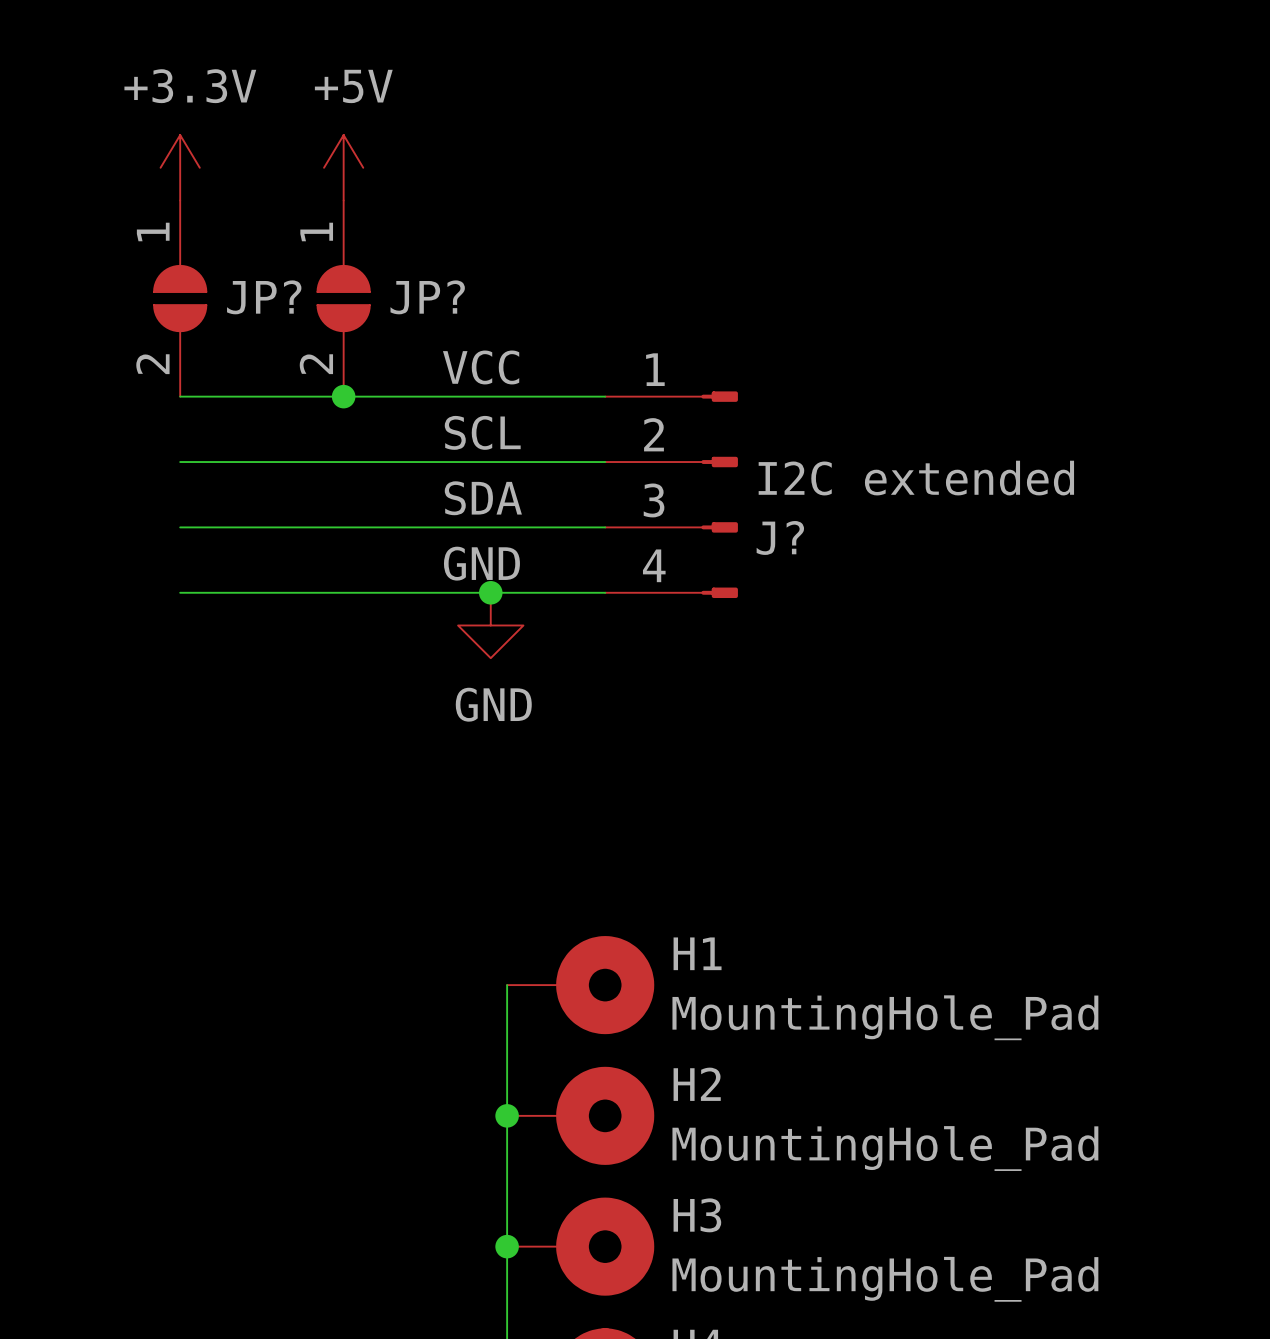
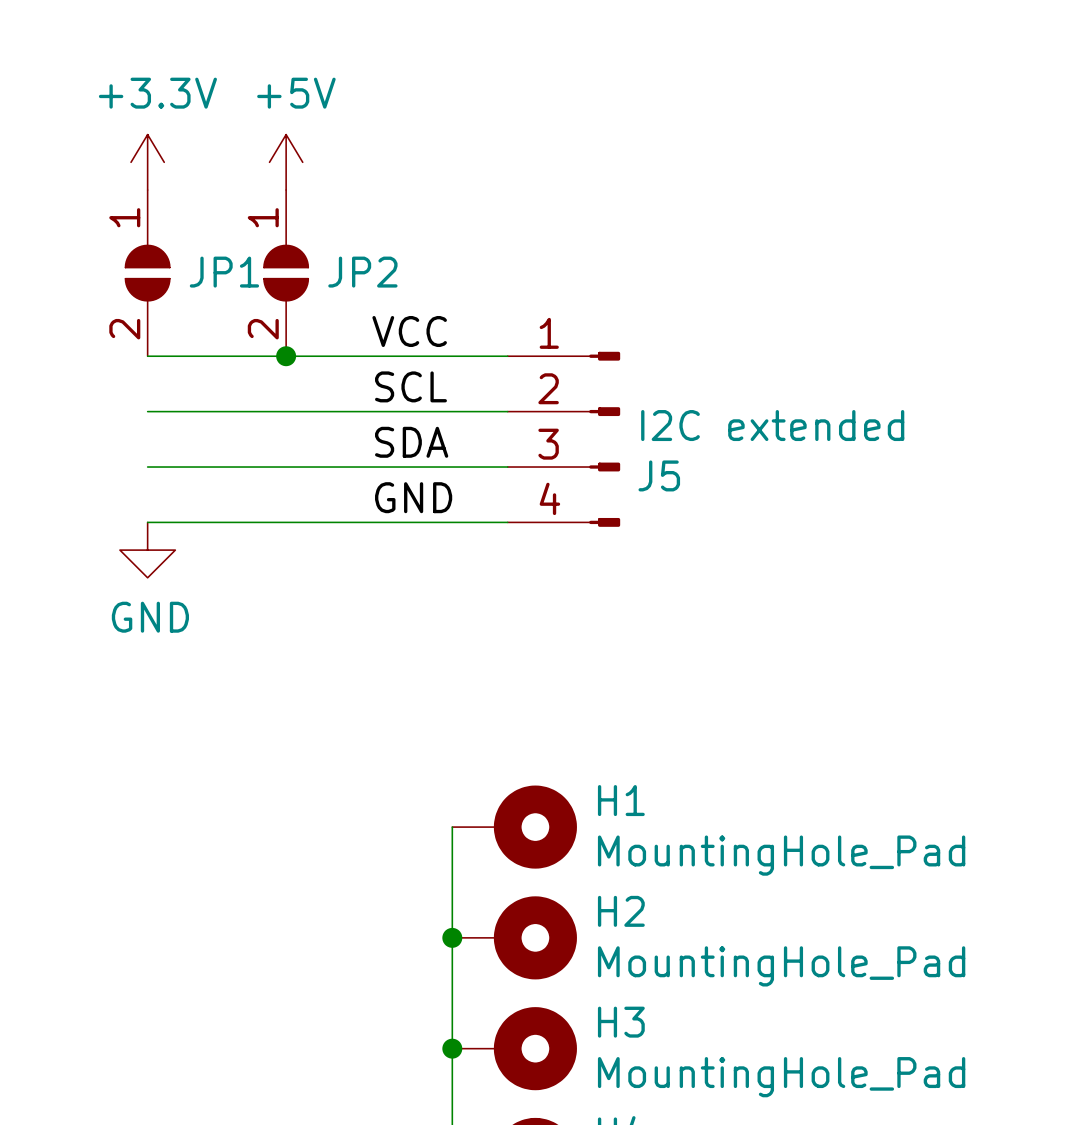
power symbol position: +3.3V (180, 167) -> +3.3V (147, 162)
power symbol position: +5V (343, 167) -> +5V (286, 162)
JP?: (180, 298) -> none
JP?: (343, 298) -> none
JP1: none -> (147, 273)
JP2: none -> (286, 273)
label position: VCC (481, 367) -> VCC (409, 331)
wire: (180, 396) (605, 396) -> (147, 356) (507, 356)
junction position: (343, 396) -> (286, 356)
label position: SCL (482, 432) -> SCL (410, 386)
wire: (180, 462) (605, 462) -> (147, 411) (507, 411)
J?: I2C extended (671, 494) -> none
label position: SDA (483, 498) -> SDA (411, 442)
wire: (180, 527) (605, 527) -> (147, 467) (507, 467)
J5: none -> I2C extended (563, 439)
label position: GND (481, 563) -> GND (413, 497)
wire: (180, 592) (605, 592) -> (147, 522) (507, 522)
junction: (490, 592) -> none
power symbol position: GND (490, 625) -> GND (147, 550)

